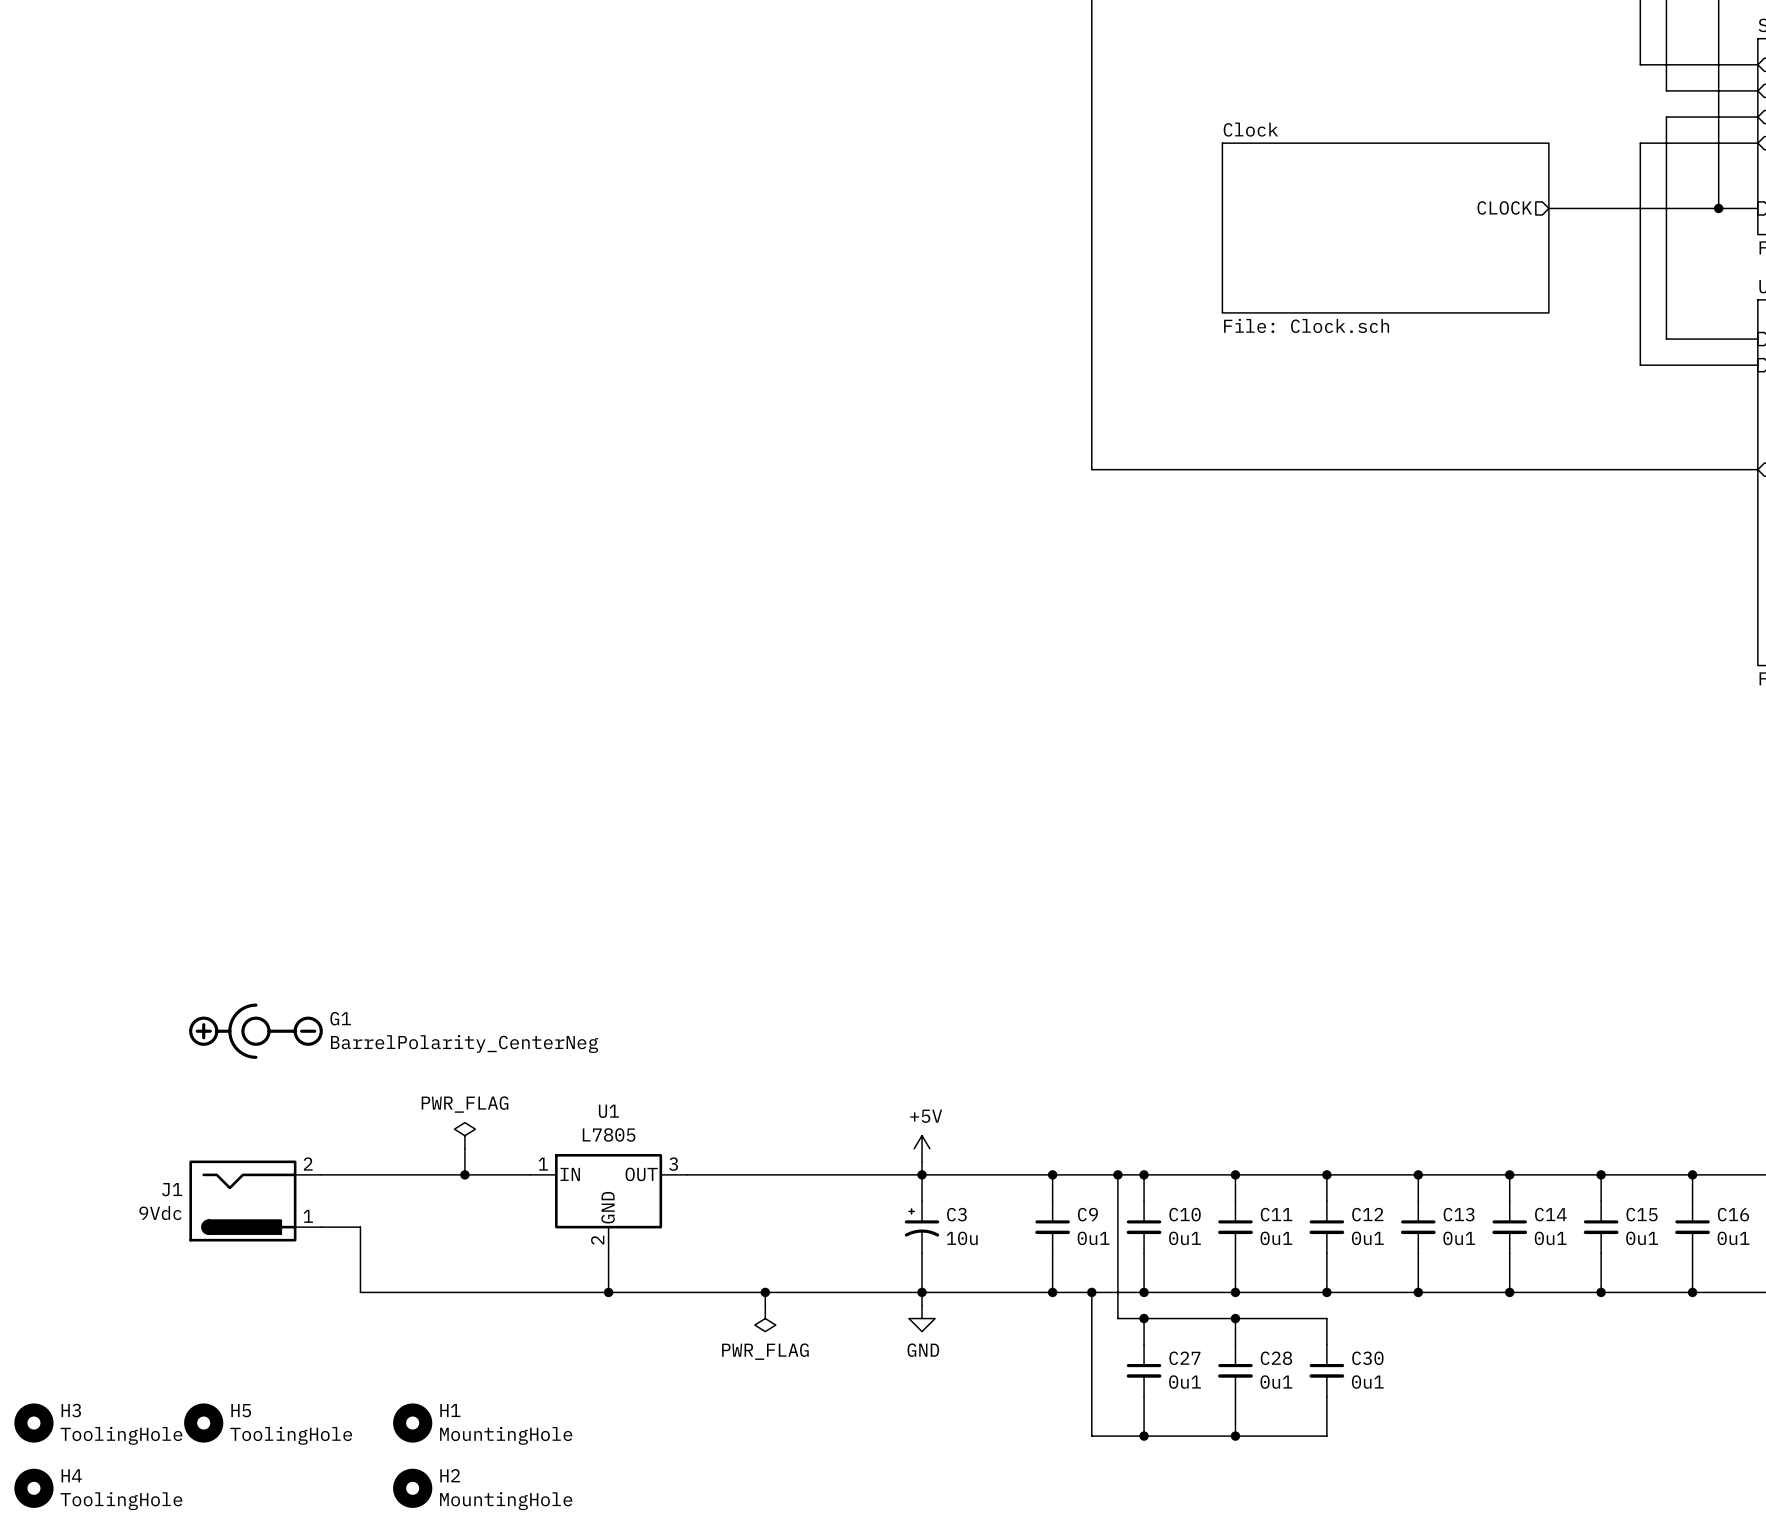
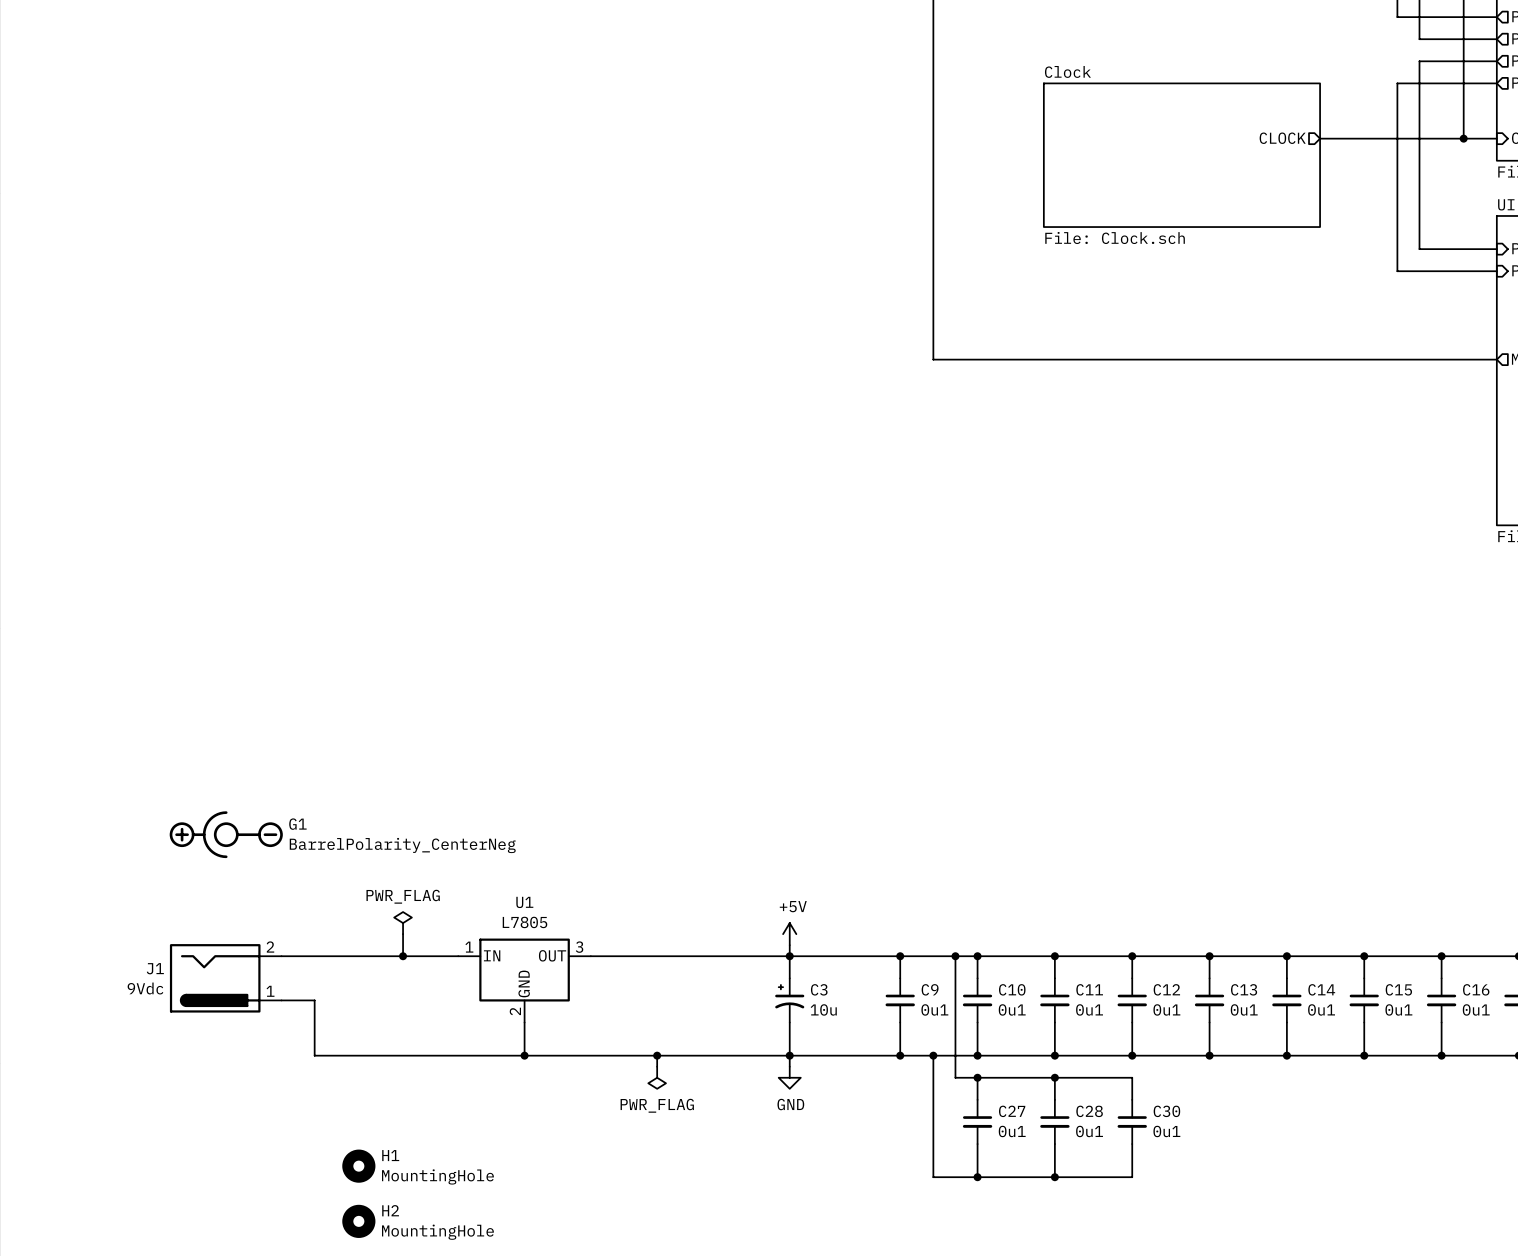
H3: ToolingHole (33, 1423) -> none
H5: ToolingHole (203, 1423) -> none
H4: ToolingHole (33, 1488) -> none

